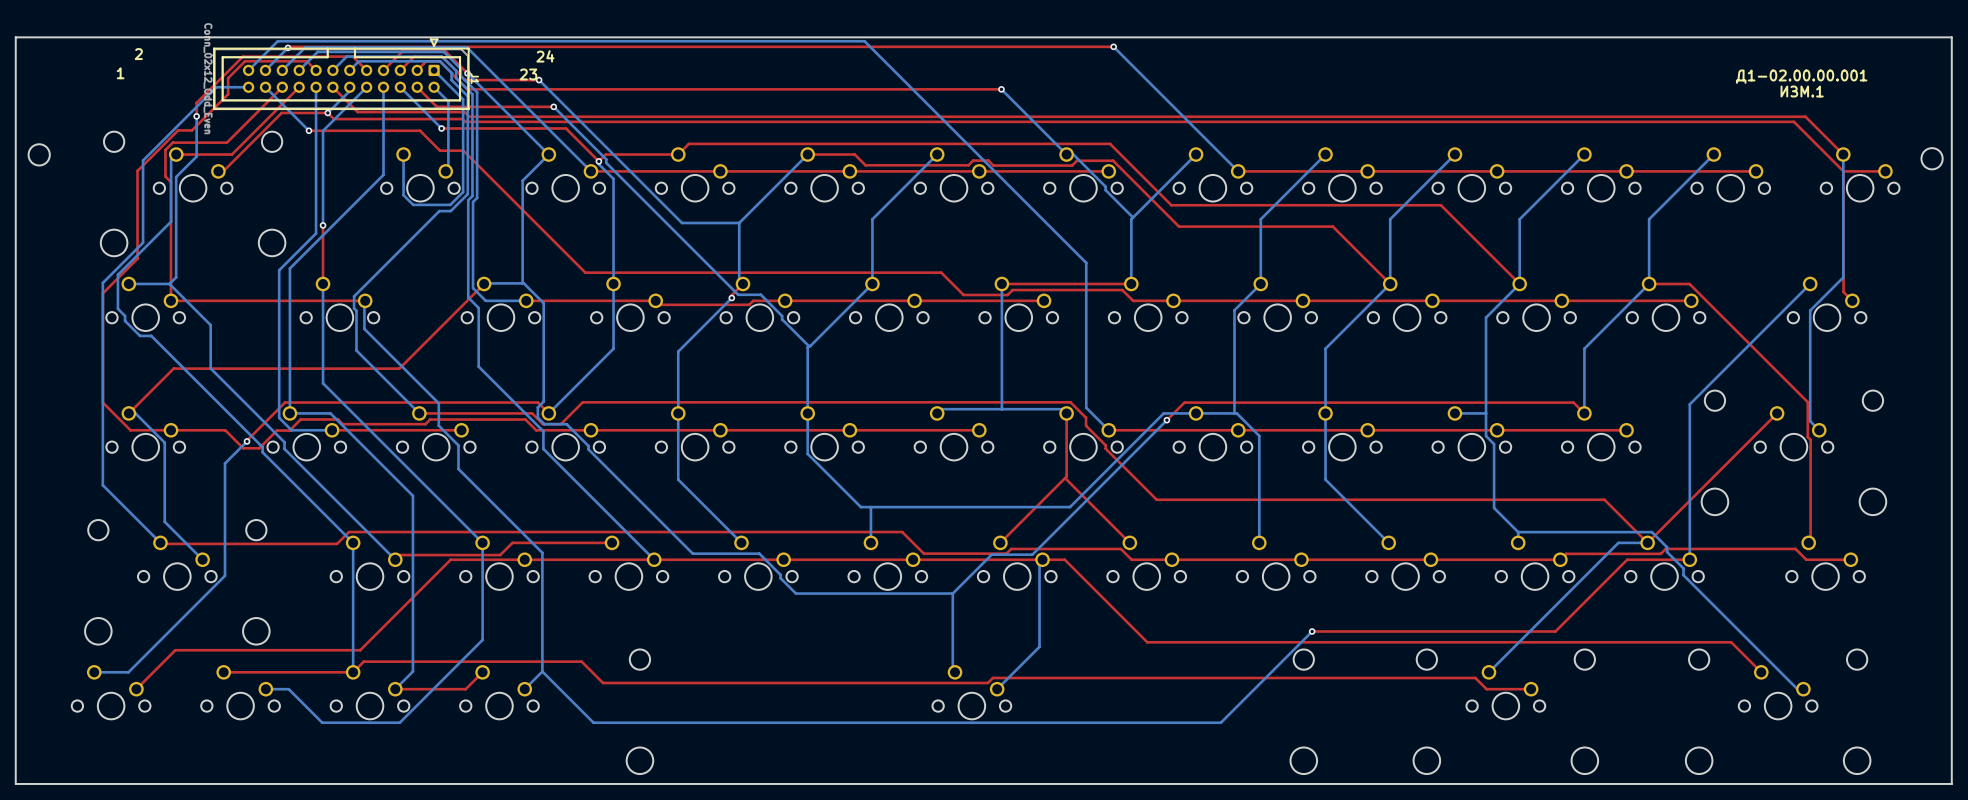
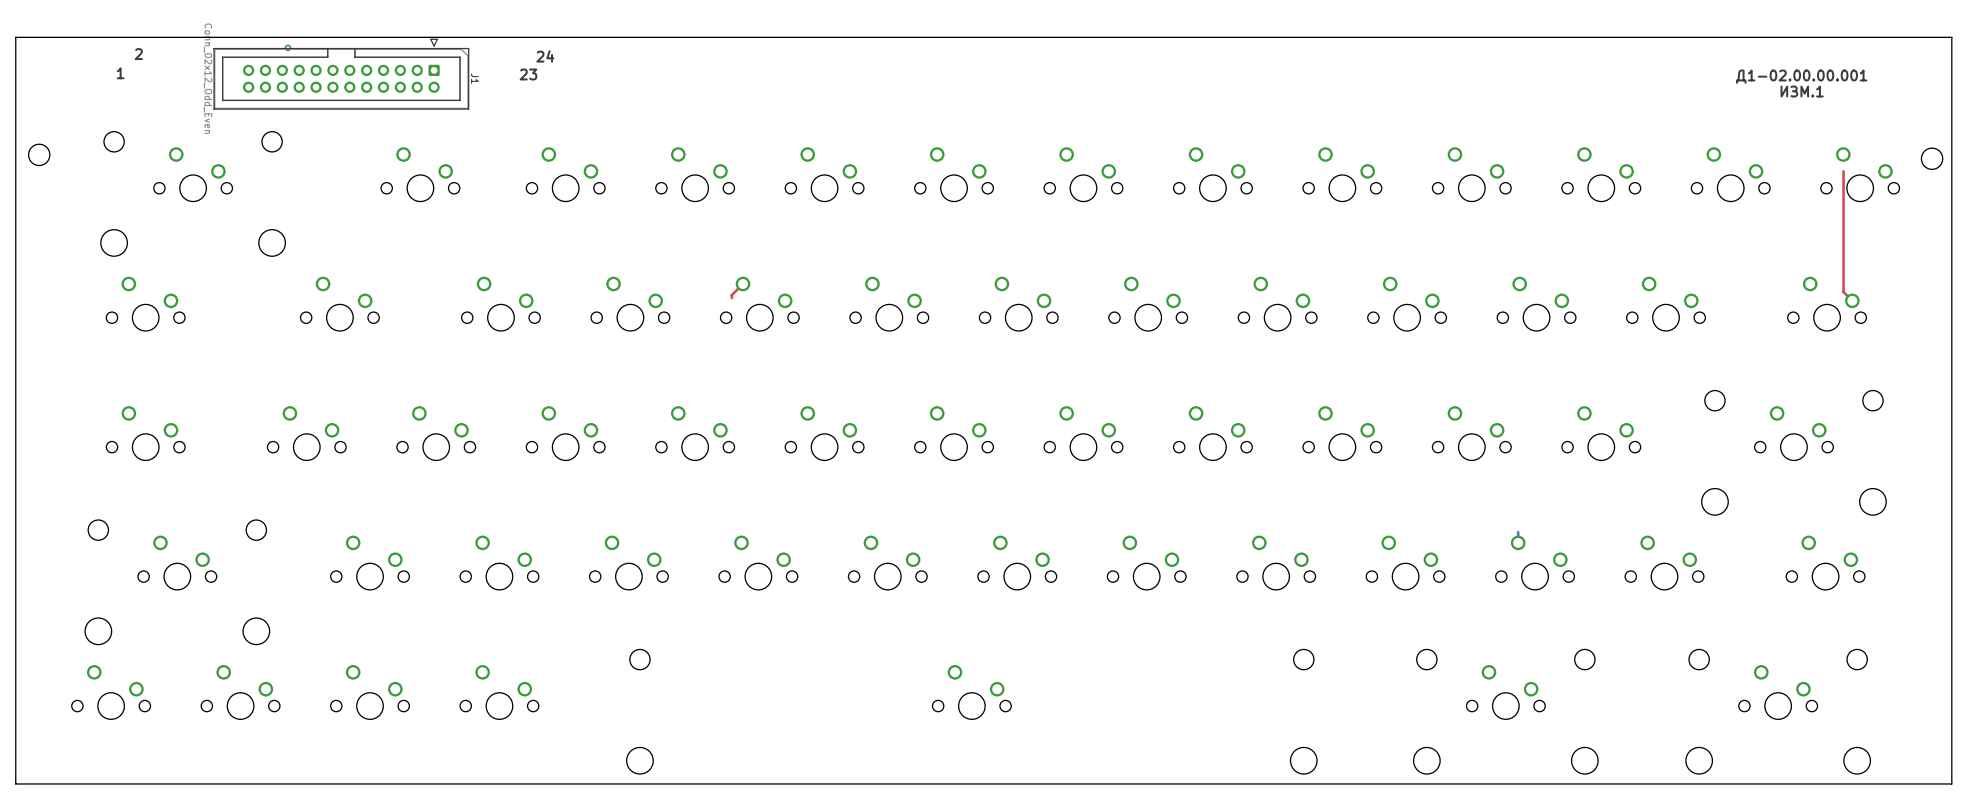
bottom track: (1113, 46) (1238, 171) -> none
top track: (1113, 46) (287, 47) -> none
via: (1113, 46) -> none
bottom track: (287, 47) (265, 70) -> none
bottom track: (248, 70) (277, 41) (864, 41) (1086, 262) (1086, 407) (1108, 430) -> none
bottom track: (282, 70) (305, 47) (466, 47) (590, 171) -> none
bottom track: (299, 70) (317, 51) (443, 51) (460, 68) (460, 76) (477, 92) (477, 197) (473, 202) (473, 288) (485, 300) (526, 300) -> none
top track: (316, 70) (306, 61) (245, 61) (228, 78) (228, 94) (192, 130) (178, 130) (137, 171) (137, 258) (102, 293) (102, 402) (130, 430) (225, 430) (243, 448) (259, 448) (276, 430) (289, 430) (300, 419) (338, 419) (342, 424) (425, 424) (430, 419) (525, 419) (536, 430) (979, 430) -> none
bottom track: (332, 70) (346, 56) (441, 56) (456, 70) (456, 78) (472, 94) (472, 196) (468, 200) (468, 297) (478, 307) (478, 366) (543, 431) (543, 448) (654, 559) -> none
bottom track: (349, 70) (358, 61) (440, 61) (451, 72) (451, 79) (467, 96) (467, 194) (450, 211) (439, 211) (354, 296) (354, 308) (356, 310) (356, 350) (419, 413) -> none
top track: (366, 70) (352, 56) (242, 56) (196, 102) (196, 116) -> none
top track: (383, 70) (402, 51) (445, 51) (467, 73) -> none
top track: (400, 70) (414, 56) (442, 56) (464, 80) (539, 80) -> none
top track: (417, 70) (426, 61) (440, 61) (467, 89) (1001, 89) -> none
bottom track: (434, 70) (463, 99) (463, 192) (450, 204) (413, 204) (403, 195) (403, 154) -> none
bottom track: (467, 73) (548, 154) -> none
via: (467, 73) -> none
bottom track: (539, 80) (682, 223) (739, 223) -> none
via: (539, 80) -> none
bottom track: (248, 87) (216, 87) (143, 160) (143, 242) (102, 282) (102, 485) (160, 542) -> none
bottom track: (265, 87) (308, 130) -> none
top track: (282, 87) (226, 142) (172, 142) (165, 149) (165, 176) (170, 182) (170, 300) (365, 300) -> none
top track: (299, 87) (231, 154) (176, 154) -> none
bottom track: (316, 87) (316, 233) (279, 270) (279, 417) (291, 430) (332, 430) -> none
top track: (332, 87) (357, 112) (464, 112) (469, 116) (1805, 116) (1843, 154) -> none
bottom track: (349, 87) (349, 91) (327, 112) -> none
bottom track: (366, 87) (323, 130) (323, 225) -> none
bottom track: (383, 87) (383, 174) (289, 268) (289, 413) (330, 413) (412, 495) (412, 671) (395, 689) -> none
bottom track: (400, 87) (441, 128) -> none
top track: (417, 87) (436, 106) (553, 106) -> none
bottom track: (434, 87) (448, 101) (448, 168) (445, 171) -> none
bottom track: (1001, 89) (1066, 154) (1073, 154) (1133, 217) -> none
via: (1001, 89) -> none
bottom track: (553, 106) (606, 159) (606, 162) (738, 294) (760, 294) (808, 346) -> none
via: (553, 106) -> none
via: (327, 112) -> none
bottom track: (196, 116) (196, 156) (176, 177) (176, 277) (169, 283) -> none
via: (196, 116) -> none
top track: (441, 128) (565, 128) (598, 161) (605, 154) (678, 154) (688, 143) (1110, 143) (1171, 205) (1440, 205) (1519, 283) -> none
via: (441, 128) -> none
top track: (308, 130) (420, 130) (440, 150) (463, 150) (585, 272) (941, 272) (963, 295) (1007, 295) (1012, 290) (1122, 290) (1133, 300) (1691, 300) -> none
via: (308, 130) -> none
bottom track: (176, 154) (171, 159) (171, 221) (117, 274) (117, 308) (125, 315) (125, 320) (140, 335) (151, 335) (262, 447) (262, 452) (353, 542) (353, 672) -> none
bottom track: (548, 154) (522, 180) (522, 283) -> none
bottom track: (807, 154) (739, 223) -> none
top track: (807, 154) (854, 154) (865, 165) (968, 165) (973, 160) (988, 160) (993, 165) (1072, 165) (1076, 160) (1113, 160) (1179, 226) (1332, 226) (1390, 283) -> none
bottom track: (937, 154) (872, 219) (872, 283) (808, 346) -> none
bottom track: (1196, 154) (1133, 217) -> none
bottom track: (1325, 154) (1260, 219) (1260, 283) (1234, 310) (1234, 413) -> none
bottom track: (1454, 154) (1390, 219) (1390, 283) (1325, 348) (1325, 479) (1388, 542) -> none
bottom track: (1584, 154) (1519, 219) (1519, 283) (1486, 317) (1486, 436) (1494, 444) (1494, 508) (1518, 532) (1651, 532) (1667, 547) (1667, 552) (1683, 568) (1683, 575) (1797, 689) (1803, 689) -> none
bottom track: (1713, 154) (1649, 219) (1649, 283) (1584, 348) (1584, 413) -> none
bottom track: (1843, 154) (1843, 277) (1810, 310) (1810, 421) (1819, 430) -> none
bottom track: (598, 161) (598, 164) (613, 178) (613, 348) (548, 413) -> none
via: (598, 161) -> none
top track: (1108, 171) (590, 171) -> none
top track: (1756, 171) (1238, 171) -> none
top track: (1885, 171) (1843, 171) (1793, 121) (465, 121) (462, 119) (333, 119) (327, 112) (281, 112) (223, 171) (218, 171) -> none
bottom track: (1133, 217) (1131, 219) (1131, 283) -> none
bottom track: (739, 223) (739, 280) (742, 283) -> none
top track: (323, 225) (323, 283) -> none
via: (323, 225) -> none
bottom track: (169, 283) (210, 325) (210, 368) (284, 442) (284, 448) (395, 559) -> none
bottom track: (169, 283) (128, 283) -> none
bottom track: (323, 283) (323, 383) (482, 542) (482, 639) (399, 722) (322, 722) (288, 689) (265, 689) -> none
bottom track: (484, 283) (523, 283) (543, 303) (543, 401) (537, 407) (537, 417) (544, 424) (566, 424) (588, 446) (588, 449) (692, 553) (759, 553) (795, 593) (952, 593) -> none
top track: (484, 283) (399, 368) (173, 368) (128, 413) -> none
bottom track: (1001, 283) (1001, 409) -> none
top track: (1131, 283) (1001, 283) -> none
top track: (1649, 283) (1689, 283) (1807, 402) (1807, 437) (1810, 439) (1810, 541) (1808, 542) -> none
bottom track: (1810, 283) (1689, 404) (1689, 559) -> none
bottom track: (731, 298) (678, 351) (678, 479) (741, 542) -> none
via: (731, 298) -> none
bottom track: (365, 300) (364, 328) (438, 403) (438, 425) (458, 445) (458, 468) (542, 552) (542, 671) -> none
top track: (1044, 300) (753, 300) (749, 304) (659, 304) (655, 300) (526, 300) -> none
bottom track: (808, 346) (807, 453) (860, 507) (1070, 507) (1163, 413) (1236, 413) (1259, 435) (1259, 542) -> none
bottom track: (128, 413) (135, 413) (164, 442) (164, 521) (202, 559) -> none
top track: (548, 413) (537, 402) (285, 402) (247, 441) -> none
bottom track: (1066, 413) (1062, 409) (941, 409) (937, 413) -> none
top track: (1066, 413) (1066, 476) (1000, 542) -> none
bottom track: (1486, 413) (1454, 413) -> none
top track: (1584, 413) (1573, 402) (1184, 402) (1166, 420) -> none
top track: (1777, 413) (1647, 542) (1604, 499) (1156, 499) (1105, 448) (1105, 445) (1086, 425) (1086, 417) (1070, 402) (582, 402) (560, 424) (542, 424) (532, 413) (419, 413) -> none
bottom track: (1166, 420) (1032, 554) (991, 554) (952, 593) -> none
via: (1166, 420) -> none
top track: (461, 430) (332, 430) -> none
top track: (1626, 430) (1108, 430) -> none
bottom track: (247, 441) (225, 463) (225, 575) (128, 672) (94, 672) -> none
via: (247, 441) -> none
top track: (1065, 478) (1129, 542) -> none
bottom track: (870, 507) (870, 542) -> none
top track: (160, 542) (337, 543) (348, 532) (902, 532) (923, 553) (1006, 553) (1011, 548) (1120, 548) (1131, 559) (1560, 559) (1566, 553) (1660, 553) (1665, 548) (1795, 548) (1806, 559) (1850, 559) -> none
top track: (612, 542) (512, 542) (500, 555) (399, 555) (395, 559) -> none
bottom track: (1647, 542) (1618, 542) (1488, 672) -> none
bottom track: (1042, 559) (1039, 562) (1039, 646) (997, 689) -> none
top track: (1689, 559) (1627, 559) (1555, 631) (1312, 631) -> none
bottom track: (952, 593) (952, 670) (955, 672) -> none
bottom track: (1312, 631) (1220, 722) (593, 722) (542, 671) -> none
via: (1312, 631) -> none
bottom track: (542, 671) (524, 689) -> none
top track: (223, 672) (353, 672) (363, 661) (581, 661) (603, 682) (987, 682) (992, 677) (1475, 677) (1486, 689) (1531, 689) -> none
top track: (482, 672) (465, 689) (395, 689) -> none
top track: (1761, 672) (1731, 642) (1147, 642) (1064, 559) (450, 559) (360, 650) (175, 650) (136, 689) -> none

